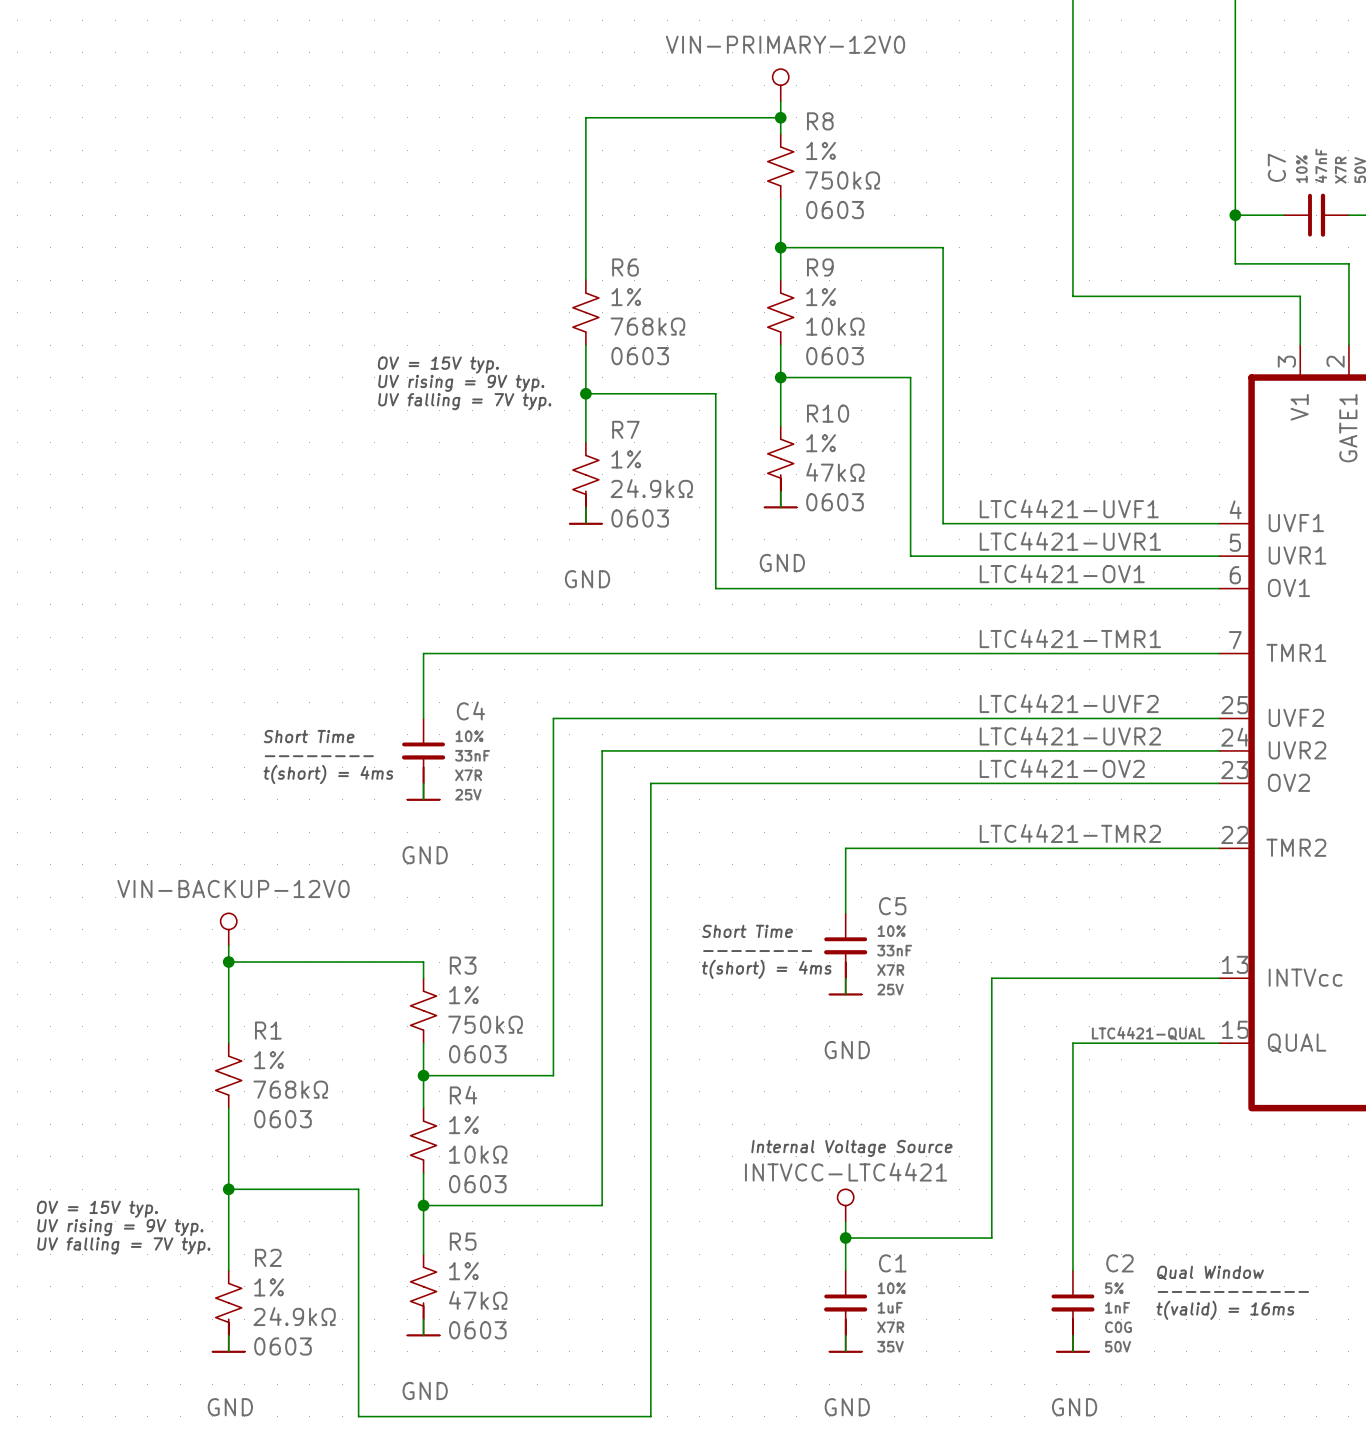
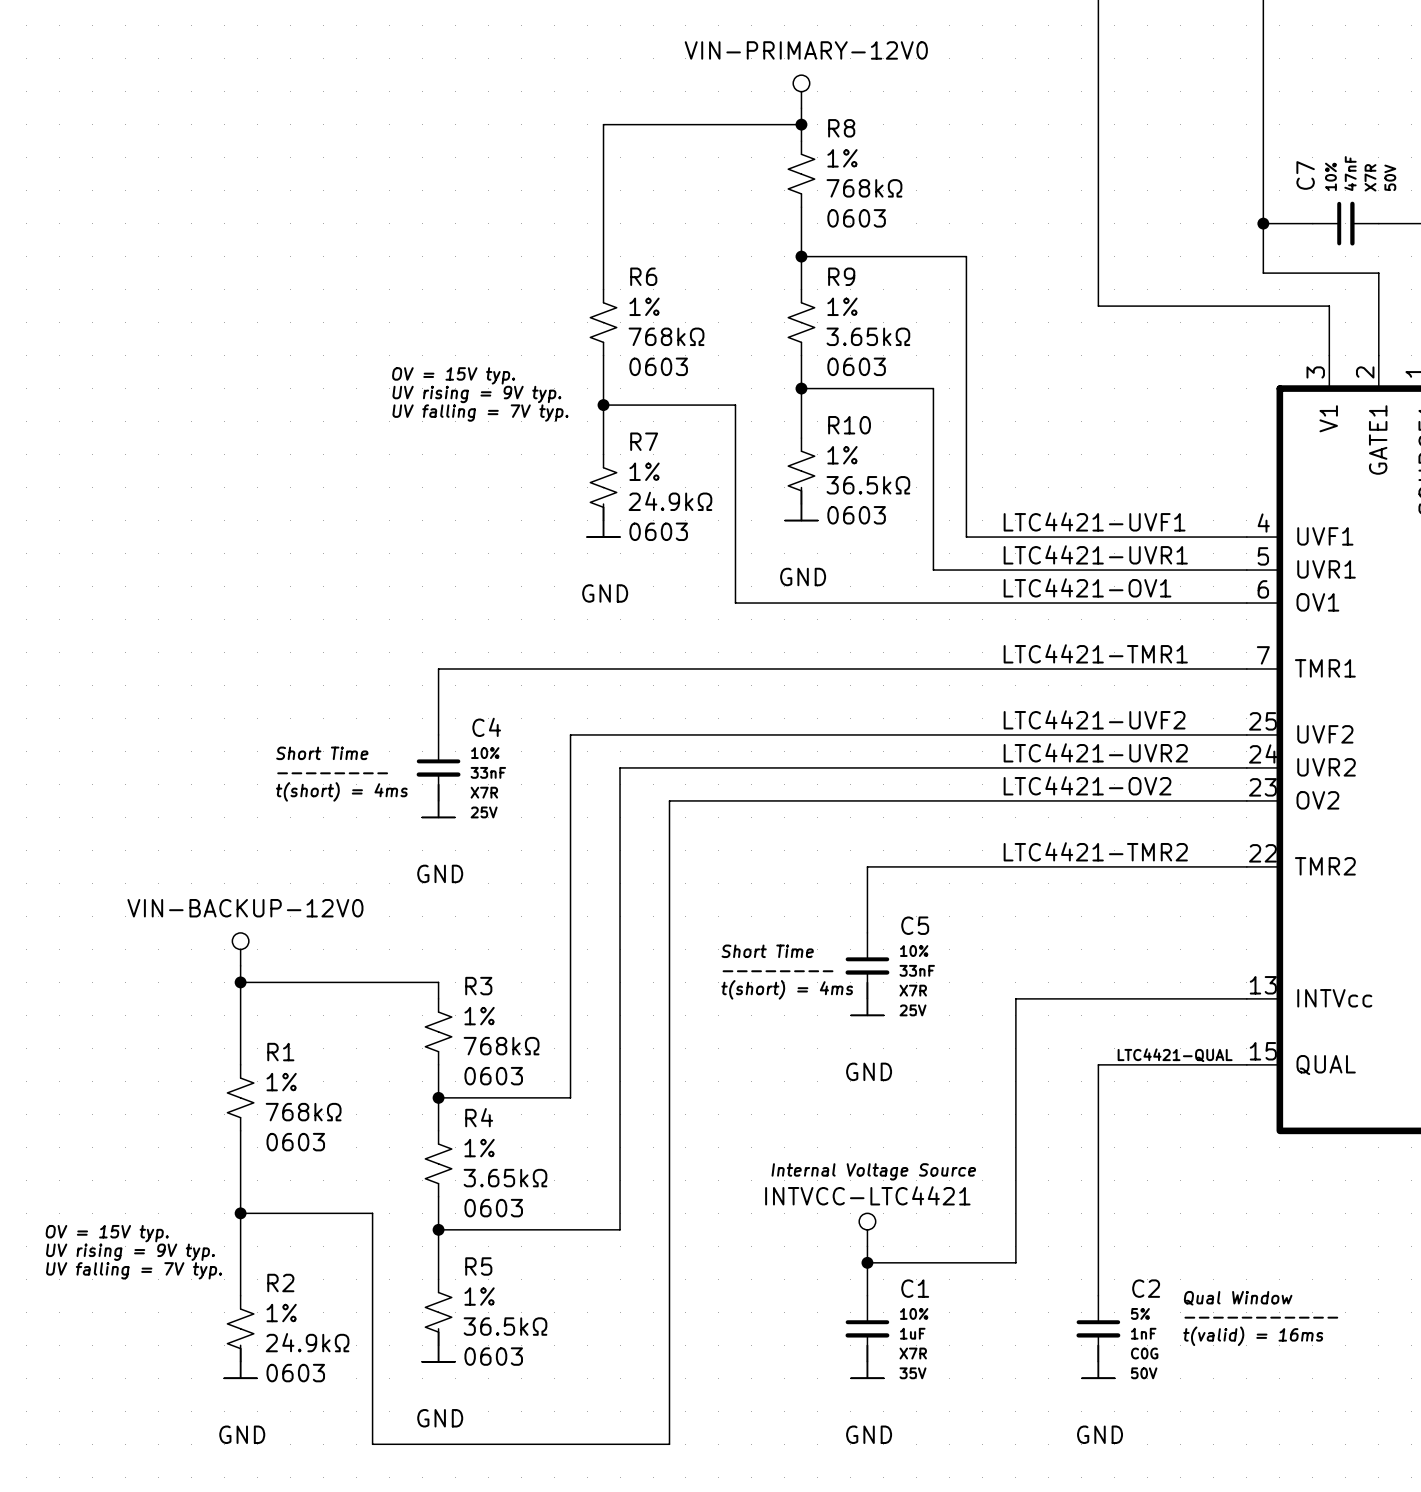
R8 text: 750kΩ (842, 180) -> 768kΩ (864, 188)
R9 text: 10kΩ (835, 326) -> 3.65kΩ (868, 336)
R10 text: 47kΩ (835, 472) -> 36.5kΩ (868, 485)
R3 text: 750kΩ (485, 1024) -> 768kΩ (501, 1046)
R4 text: 10kΩ (478, 1154) -> 3.65kΩ (505, 1178)
R5 text: 47kΩ (478, 1300) -> 36.5kΩ (505, 1326)

